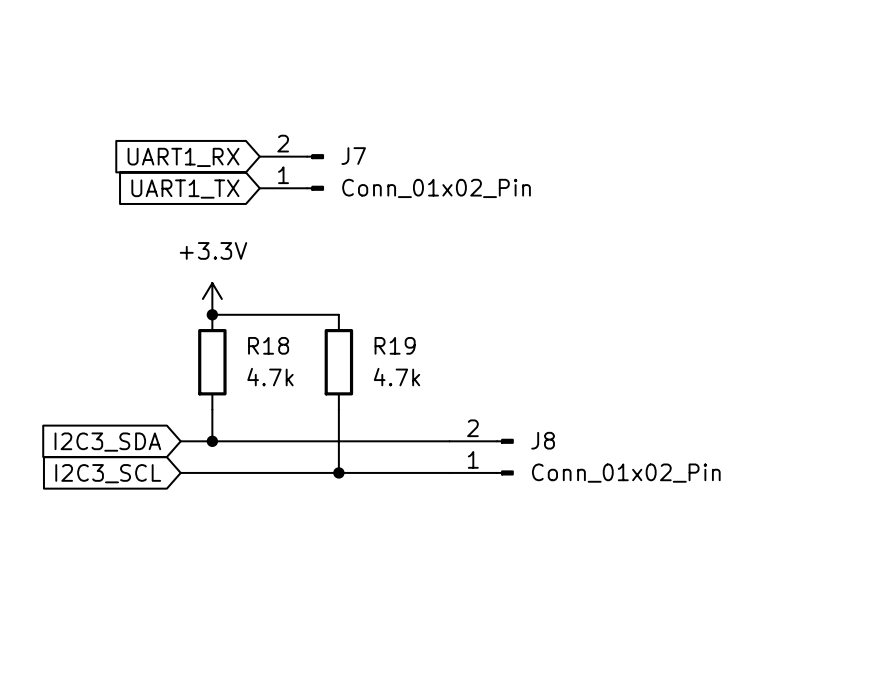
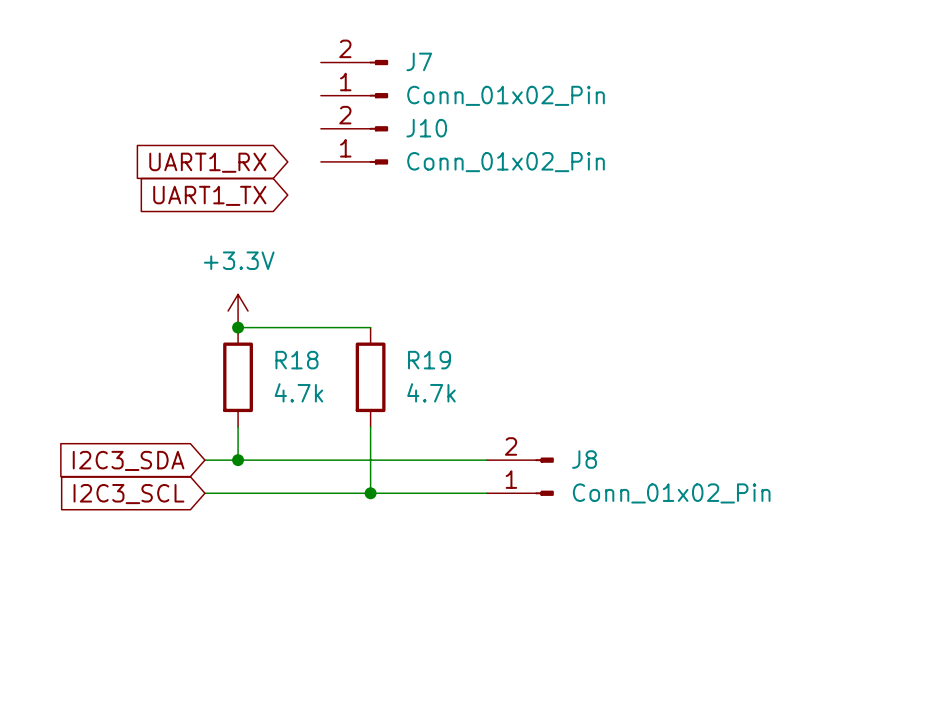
J10: none -> Conn_01x02_Pin (354, 145)
J7 position: (291, 172) -> (354, 79)

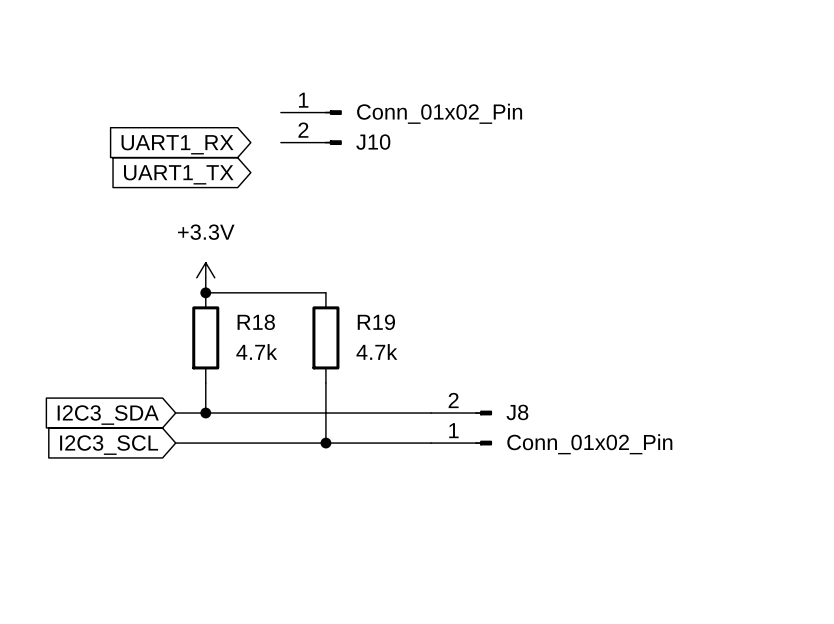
J7: Conn_01x02_Pin (354, 79) -> none
J10 flip: as is (378, 145) -> up-down (333, 127)

